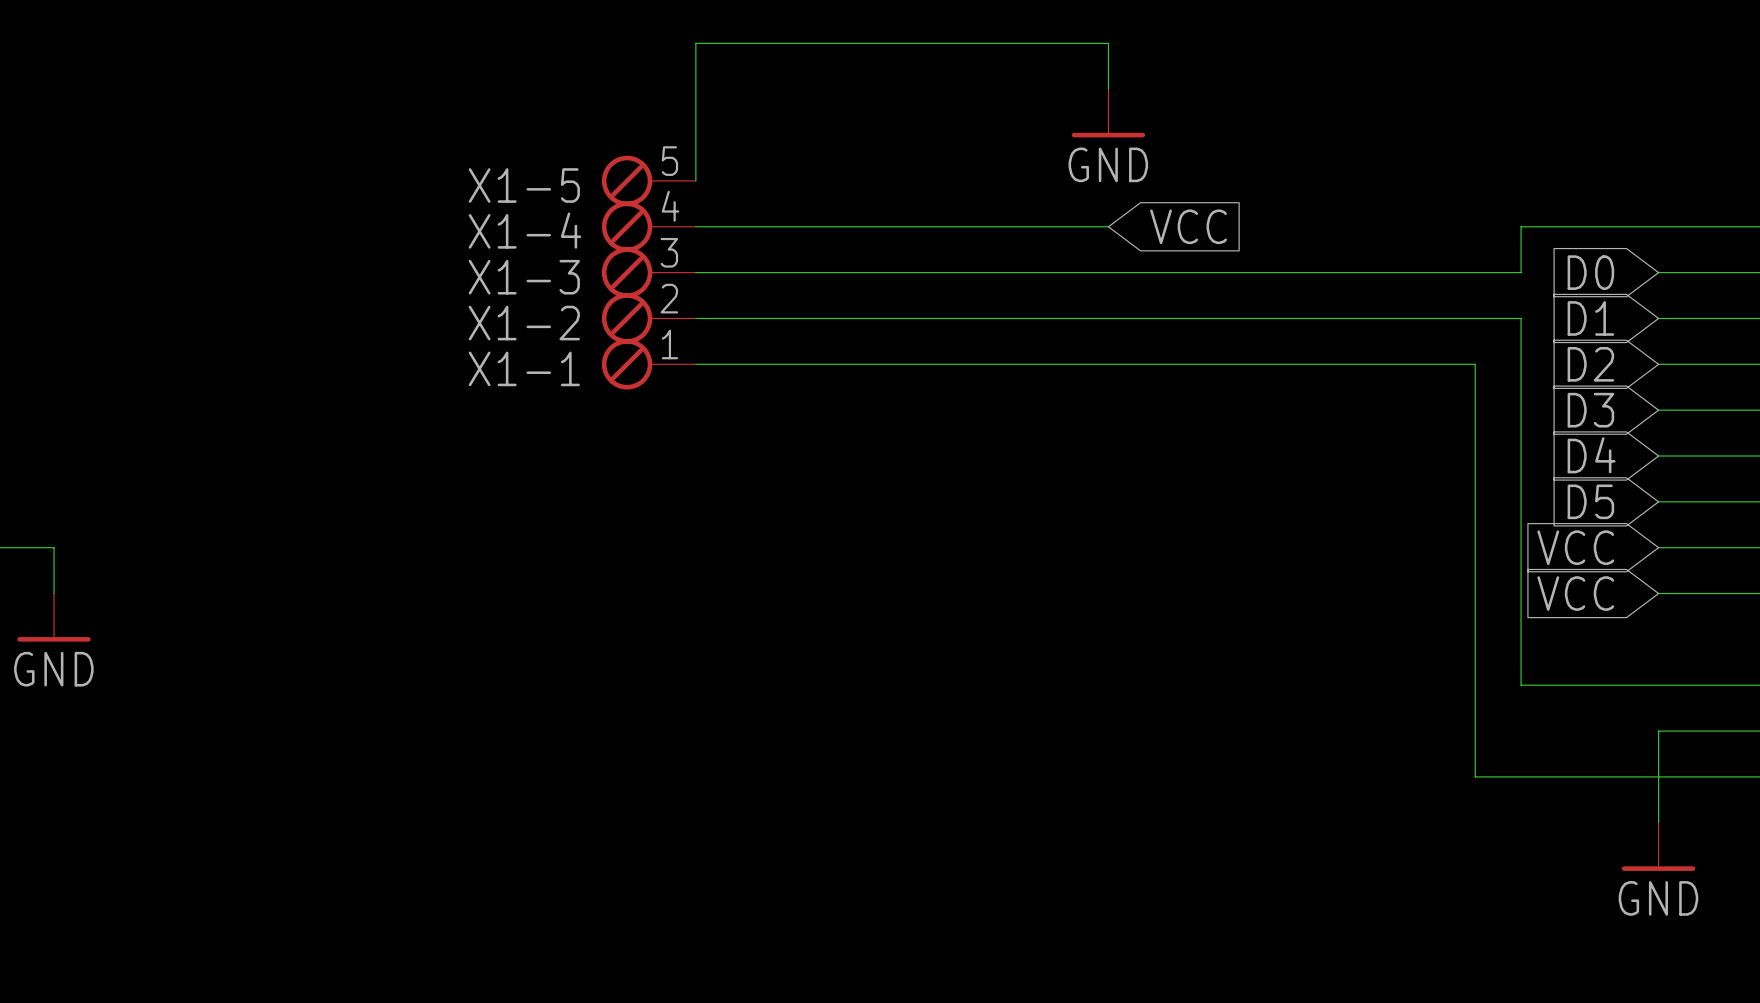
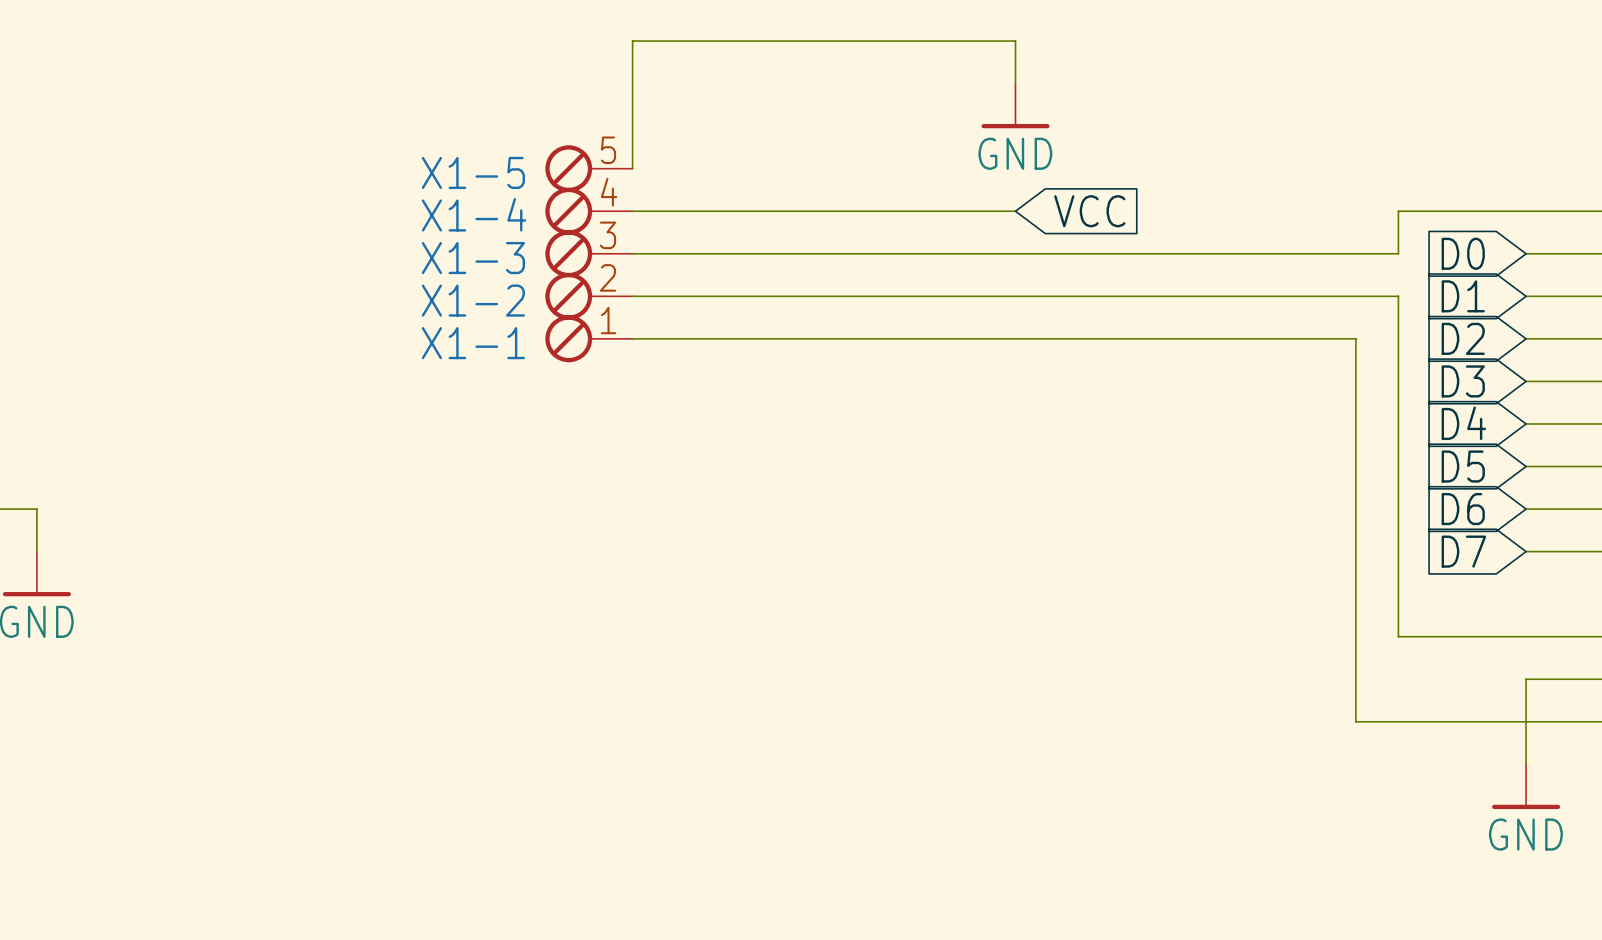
global label: VCC (1575, 547) -> D6 (1463, 509)
global label: VCC (1575, 593) -> D7 (1463, 551)

